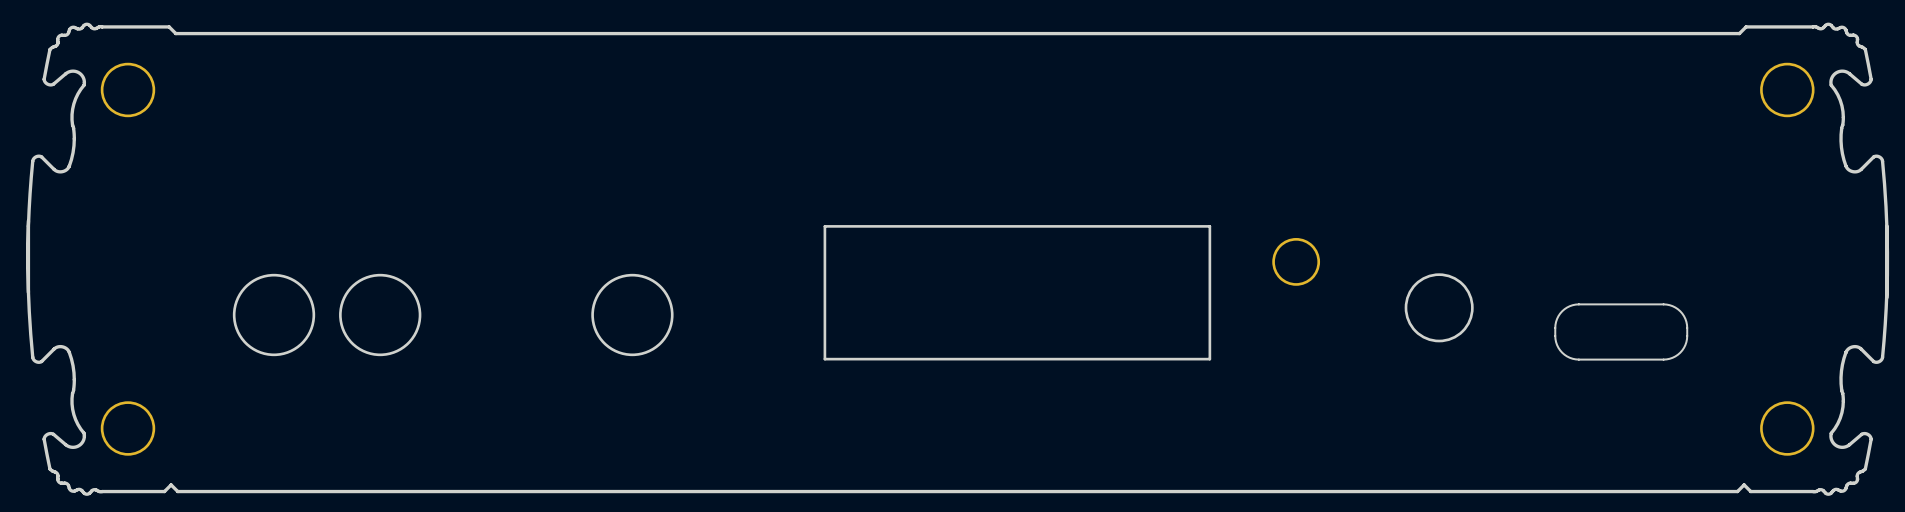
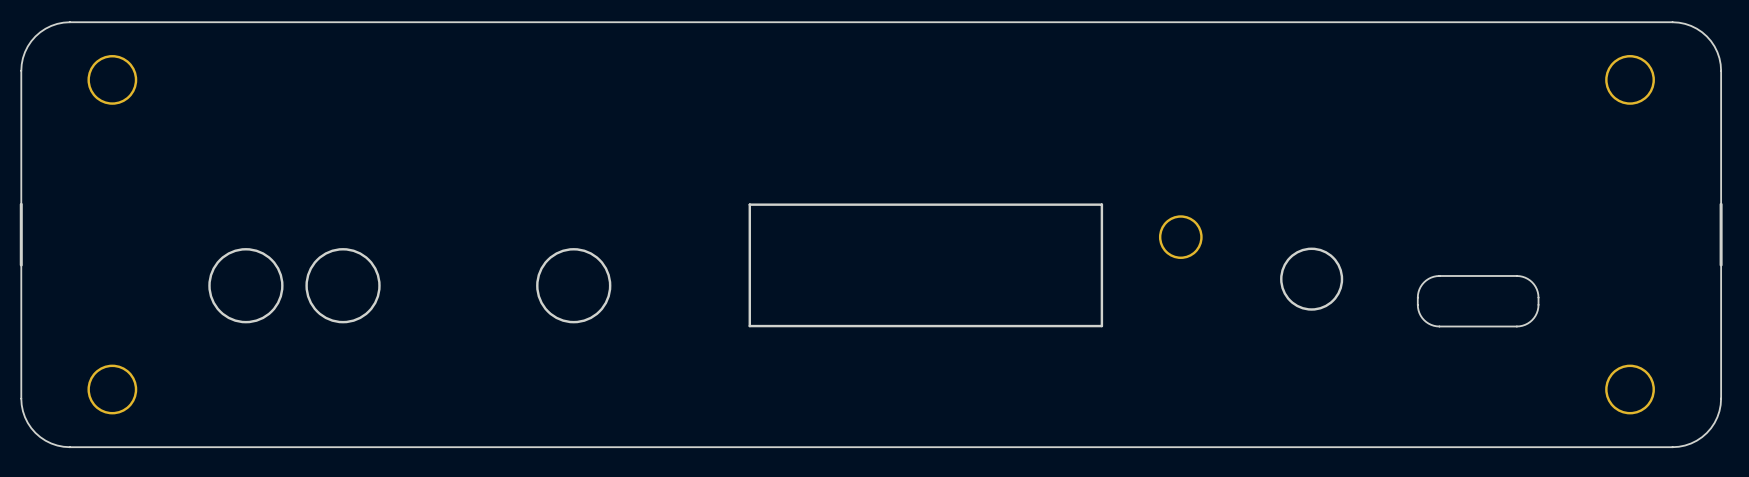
board edge: (28, 220) (28, 289) (32, 357) (35, 361) (40, 362) (56, 347) (63, 347) (68, 350) (73, 372) (72, 409) (75, 419) (84, 434) (81, 443) (73, 447) (66, 445) (52, 433) (45, 435) (44, 439) (49, 468) (57, 473) (58, 481) (67, 483) (70, 490) (79, 489) (86, 494) (94, 489) (100, 491) (164, 491) (171, 484) (177, 491) (1737, 491) (1744, 484) (1750, 491) (1814, 491) (1820, 489) (1828, 494) (1835, 489) (1844, 490) (1848, 483) (1856, 482) (1857, 473) (1865, 468) (1871, 439) (1869, 435) (1862, 433) (1848, 445) (1841, 447) (1833, 442) (1830, 434) (1841, 412) (1843, 400) (1841, 371) (1847, 350) (1851, 347) (1857, 346) (1874, 361) (1878, 361) (1882, 358) (1886, 292) -> (21, 265) (21, 398) (22, 411) (31, 428) (40, 437) (51, 443) (63, 446) (1672, 447) (1685, 445) (1702, 437) (1711, 428) (1719, 411) (1721, 398) (1721, 265)
board edge: (28, 226) (33, 159) (36, 156) (41, 156) (58, 171) (63, 171) (68, 168) (73, 145) (72, 109) (75, 98) (84, 83) (81, 74) (73, 71) (66, 73) (52, 84) (45, 82) (44, 79) (49, 49) (57, 44) (58, 36) (67, 34) (70, 28) (79, 29) (86, 24) (94, 28) (100, 26) (169, 26) (175, 33) (1739, 33) (1746, 26) (1814, 26) (1820, 28) (1828, 24) (1835, 29) (1844, 28) (1848, 34) (1856, 36) (1857, 44) (1865, 49) (1871, 79) (1869, 82) (1862, 84) (1848, 72) (1841, 71) (1834, 74) (1830, 83) (1841, 105) (1843, 117) (1841, 147) (1847, 168) (1851, 171) (1858, 171) (1874, 156) (1879, 157) (1882, 160) (1886, 229) (1886, 297) -> (21, 204) (21, 70) (22, 58) (27, 46) (35, 36) (45, 28) (63, 22) (1672, 22) (1685, 23) (1702, 32) (1711, 41) (1719, 58) (1721, 70) (1721, 204)

